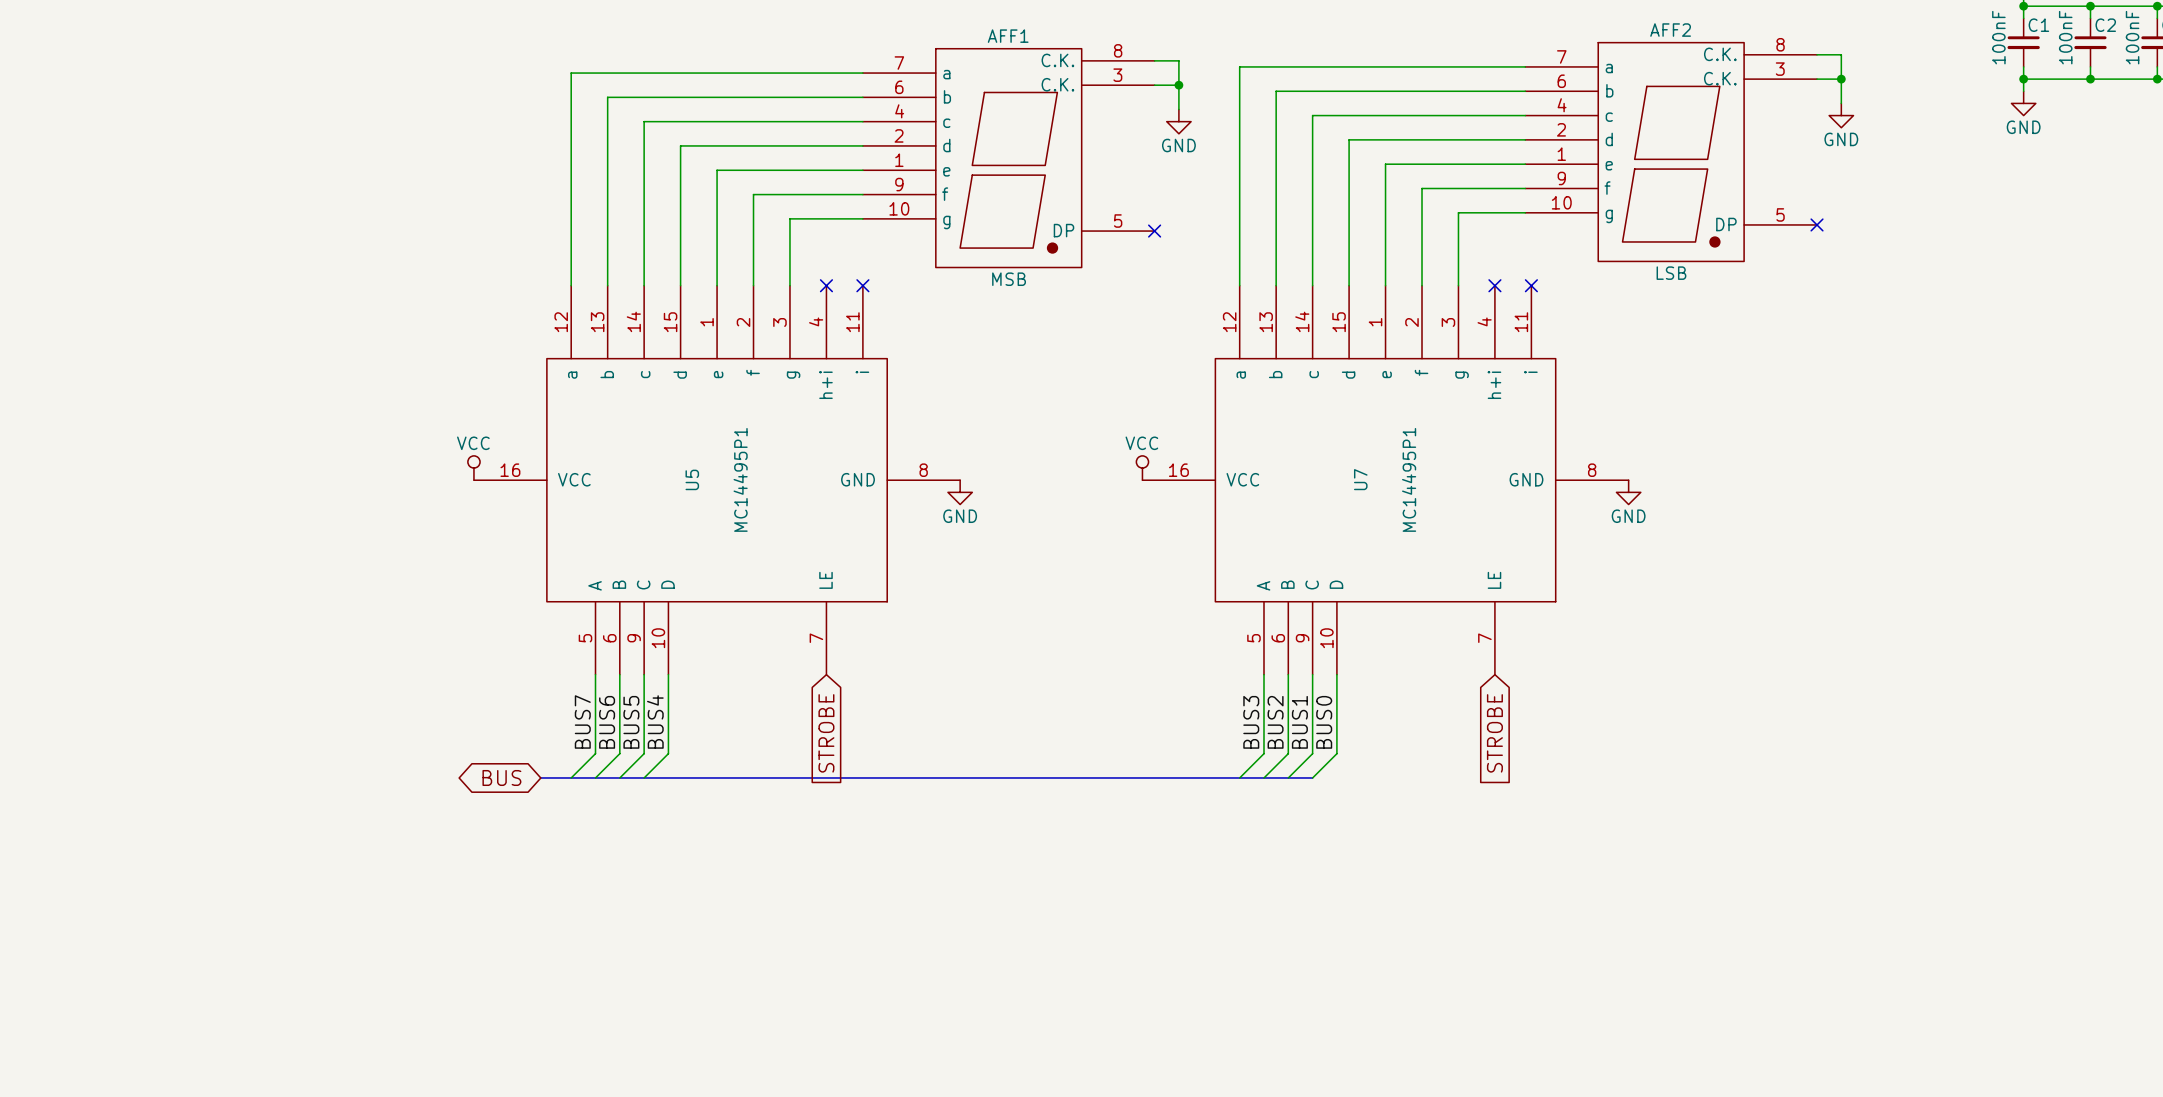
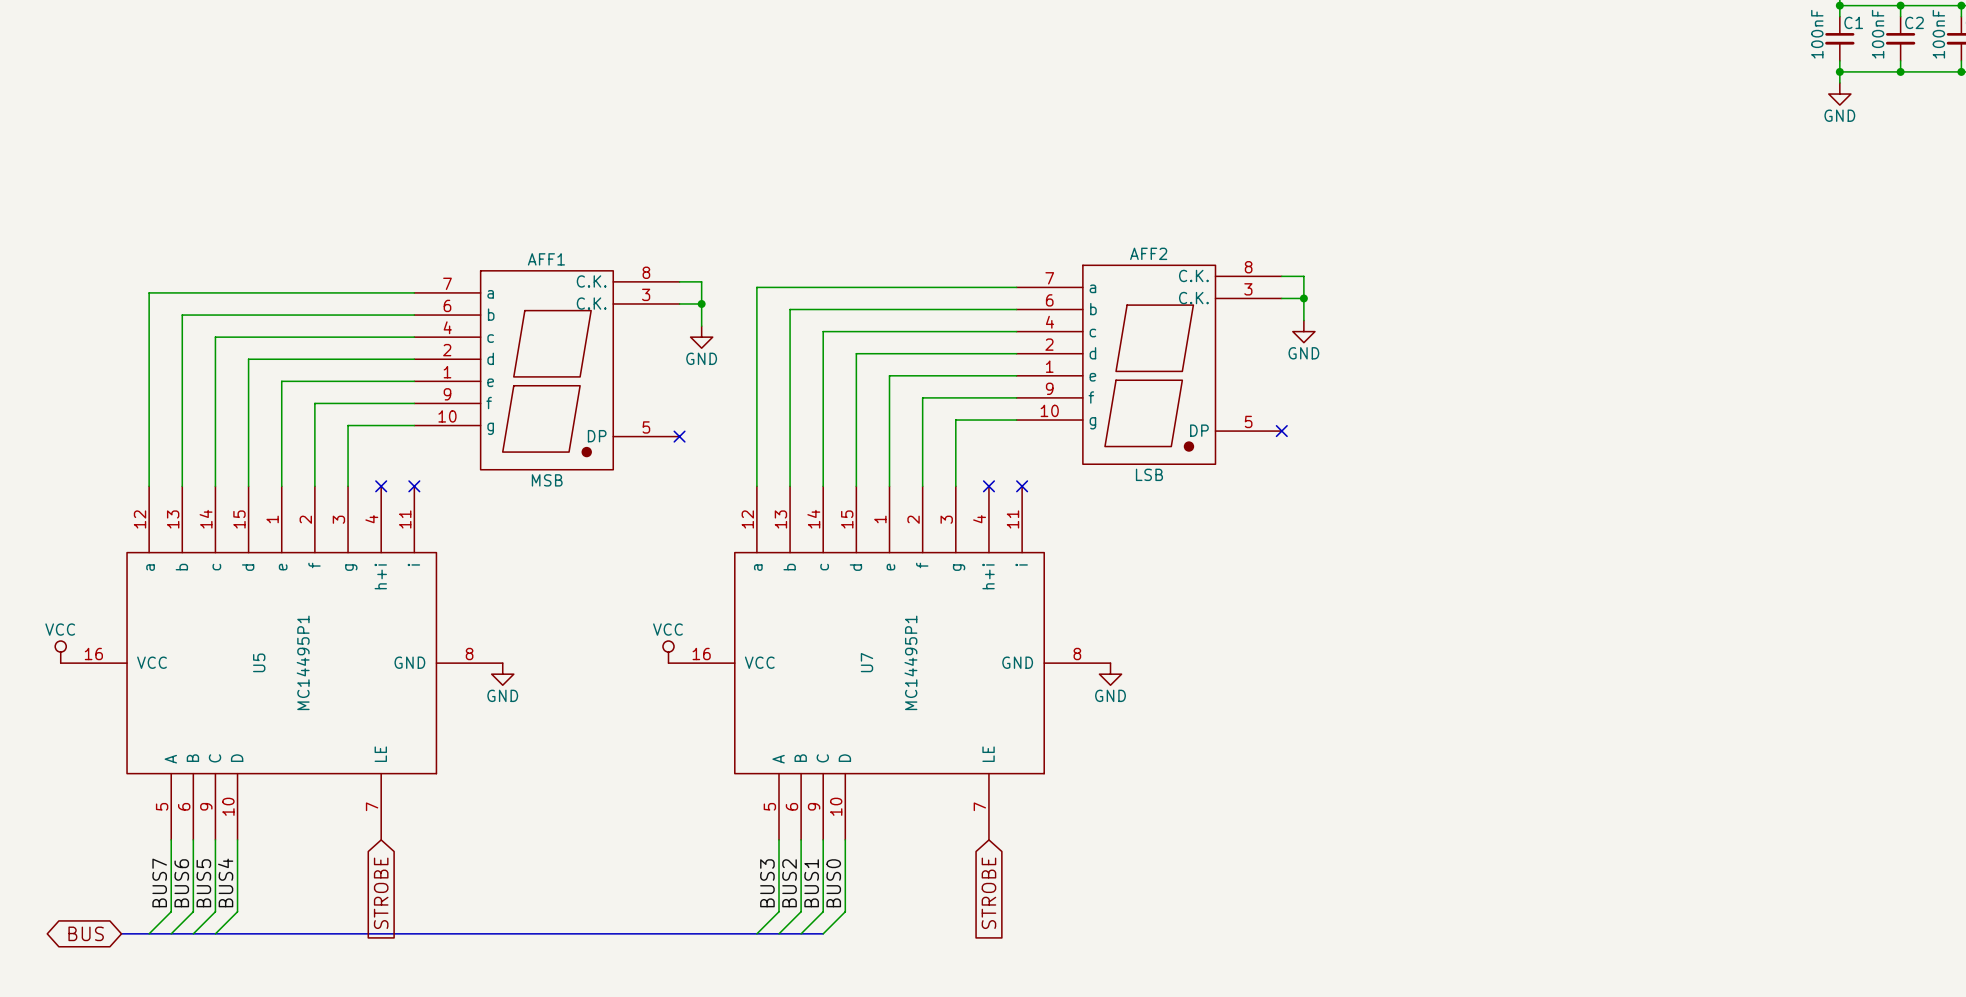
wire: (1817, 54) (1841, 54) (1841, 103) -> none
wire: (1154, 60) (1178, 60) (1178, 109) -> none
wire: (1525, 66) (1239, 66) (1239, 285) -> none
wire: (862, 73) (571, 73) (571, 285) -> none
wire: (1817, 79) (1841, 79) -> none
junction: (1841, 79) -> none
wire: (1154, 85) (1178, 85) -> none
junction: (1178, 85) -> none
wire: (1525, 91) (1276, 91) (1276, 285) -> none
wire: (862, 97) (607, 97) (607, 285) -> none
wire: (1525, 115) (1312, 115) (1312, 285) -> none
power symbol: GND (1841, 115) -> none
wire: (862, 121) (644, 121) (644, 285) -> none
power symbol: GND (1178, 121) -> none
wire: (1525, 139) (1349, 139) (1349, 285) -> none
wire: (862, 145) (680, 145) (680, 285) -> none
AFF2 position: (1671, 152) -> (1149, 364)
AFF1 position: (1008, 158) -> (546, 370)
wire: (1525, 164) (1385, 164) (1385, 285) -> none
wire: (862, 170) (717, 170) (717, 285) -> none
wire: (1525, 188) (1422, 188) (1422, 285) -> none
wire: (862, 194) (753, 194) (753, 285) -> none
wire: (1525, 212) (1458, 212) (1458, 285) -> none
wire: (862, 218) (789, 218) (789, 285) -> none
no-connect mark: (1817, 224) -> none
no-connect mark: (1154, 231) -> none
no-connect mark: (826, 285) -> none
no-connect mark: (862, 285) -> none
no-connect mark: (1494, 285) -> none
no-connect mark: (1531, 285) -> none
wire: none -> (1281, 276) (1303, 276) (1303, 320)
wire: none -> (679, 281) (701, 281) (701, 326)
wire: none -> (1016, 287) (756, 287) (756, 486)
wire: none -> (414, 292) (149, 292) (149, 486)
wire: none -> (1281, 298) (1303, 298)
junction: none -> (1303, 298)
wire: none -> (679, 303) (701, 303)
junction: none -> (701, 303)
wire: none -> (1016, 309) (790, 309) (790, 486)
wire: none -> (414, 315) (182, 315) (182, 486)
wire: none -> (1016, 331) (823, 331) (823, 486)
power symbol: none -> GND (1303, 331)
wire: none -> (414, 337) (215, 337) (215, 486)
power symbol: none -> GND (701, 337)
wire: none -> (1016, 353) (856, 353) (856, 486)
wire: none -> (414, 359) (248, 359) (248, 486)
wire: none -> (1016, 375) (889, 375) (889, 486)
wire: none -> (414, 381) (281, 381) (281, 486)
wire: none -> (1016, 397) (922, 397) (922, 486)
wire: none -> (414, 403) (314, 403) (314, 486)
wire: none -> (1016, 420) (955, 420) (955, 486)
wire: none -> (414, 425) (348, 425) (348, 486)
power symbol: VCC (473, 468) -> none
power symbol: VCC (1142, 468) -> none
no-connect mark: none -> (1281, 431)
U5 position: (717, 480) -> (281, 663)
no-connect mark: none -> (679, 436)
U7 position: (1385, 480) -> (889, 663)
power symbol: GND (960, 492) -> none
power symbol: GND (1628, 492) -> none
no-connect mark: none -> (381, 486)
no-connect mark: none -> (414, 486)
no-connect mark: none -> (988, 486)
no-connect mark: none -> (1022, 486)
wire: (595, 674) (595, 753) (571, 777) -> none
wire: (619, 674) (619, 753) (595, 777) -> none
wire: (644, 674) (644, 753) (619, 777) -> none
wire: (668, 674) (668, 753) (644, 777) -> none
wire: (1263, 674) (1263, 753) (1239, 777) -> none
wire: (1288, 674) (1288, 753) (1263, 777) -> none
wire: (1312, 674) (1312, 753) (1288, 777) -> none
wire: (1336, 674) (1336, 753) (1312, 777) -> none
power symbol: none -> VCC (60, 652)
power symbol: none -> VCC (668, 652)
label: BUS7 (582, 721) -> none
label: BUS4 (655, 721) -> none
label: BUS6 (607, 722) -> none
label: BUS5 (631, 722) -> none
label: BUS3 (1251, 722) -> none
label: BUS2 (1275, 722) -> none
label: BUS1 (1299, 722) -> none
label: BUS0 (1324, 722) -> none
global label: STROBE (826, 733) -> none
global label: STROBE (1494, 733) -> none
power symbol: none -> GND (502, 674)
power symbol: none -> GND (1110, 674)
global label: BUS (501, 777) -> none
bus: (540, 777) (1312, 777) -> none
wire: none -> (171, 839) (171, 911) (149, 933)
wire: none -> (193, 839) (193, 911) (171, 933)
wire: none -> (215, 839) (215, 911) (193, 933)
wire: none -> (237, 839) (237, 911) (215, 933)
wire: none -> (779, 839) (779, 911) (756, 933)
wire: none -> (801, 839) (801, 911) (779, 933)
wire: none -> (823, 839) (823, 911) (801, 933)
wire: none -> (845, 839) (845, 911) (823, 933)
label: none -> BUS7 (159, 882)
label: none -> BUS6 (181, 883)
label: none -> BUS5 (203, 883)
label: none -> BUS4 (225, 882)
label: none -> BUS3 (767, 883)
label: none -> BUS2 (789, 883)
label: none -> BUS1 (811, 883)
label: none -> BUS0 (833, 883)
global label: none -> STROBE (381, 893)
global label: none -> STROBE (988, 893)
global label: none -> BUS (86, 933)
bus: none -> (121, 933) (823, 933)

